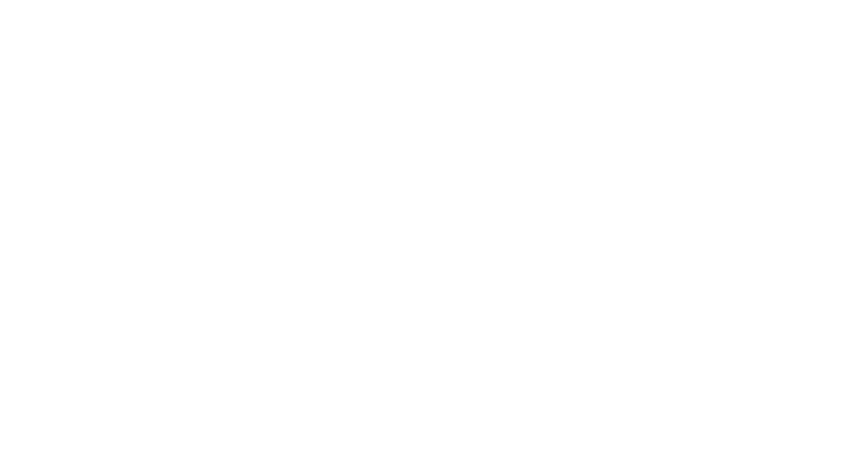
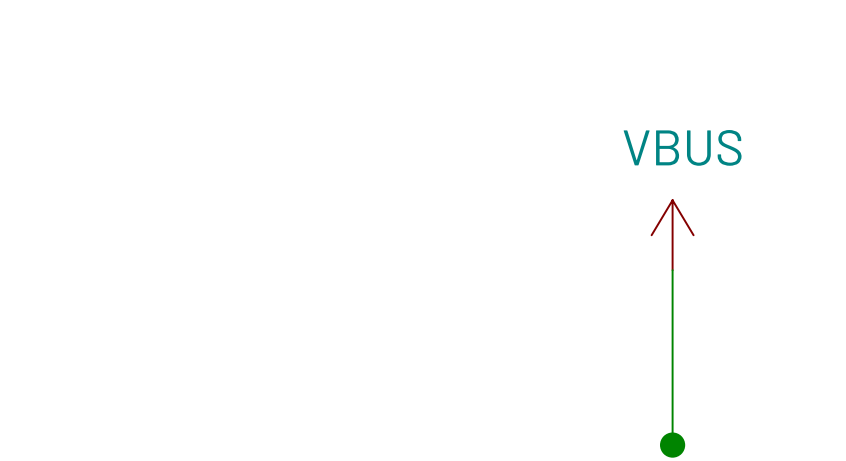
power symbol: none -> VBUS (672, 235)
wire: none -> (672, 270) (672, 445)
junction: none -> (672, 445)

